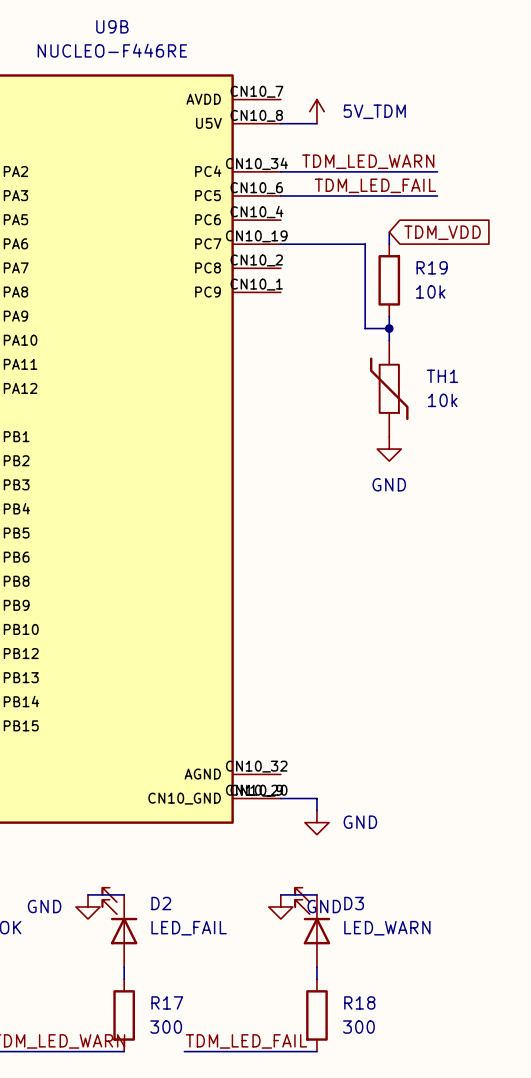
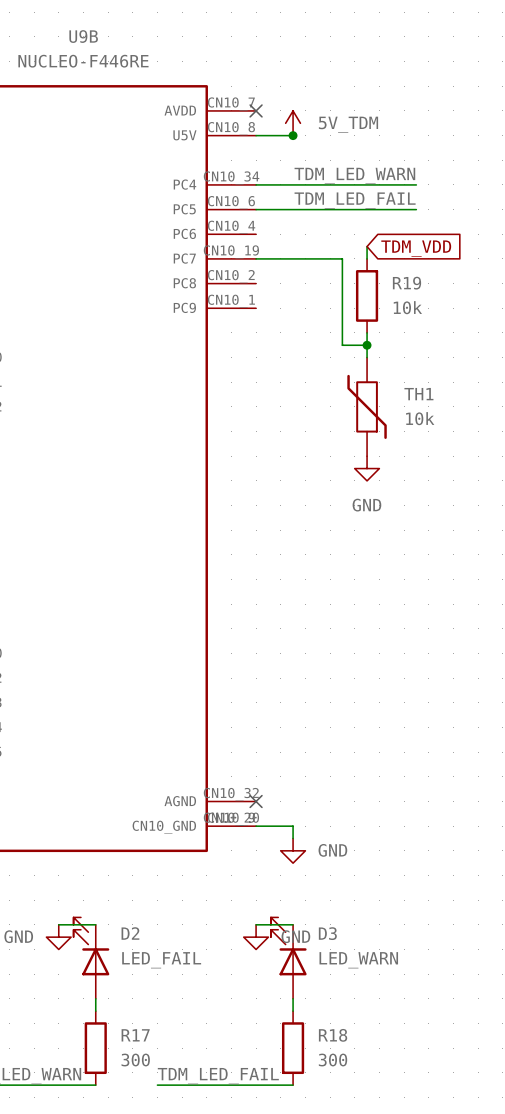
no-connect mark: none -> (256, 110)
junction: none -> (293, 135)
no-connect mark: none -> (256, 801)

